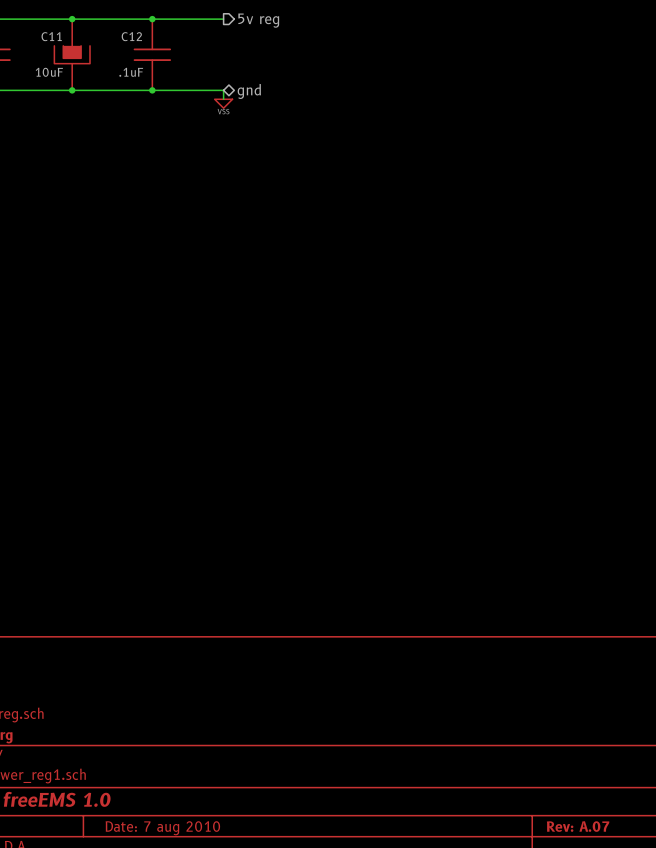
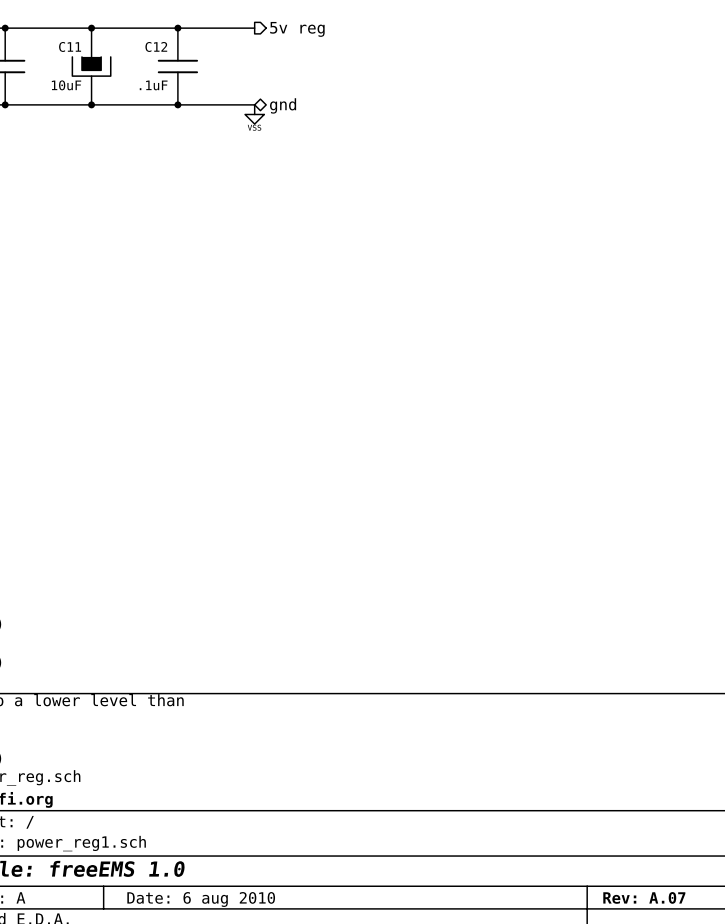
title block: Date: 7 aug 2010 (162, 828) -> Date: 6 aug 2010 (201, 899)

